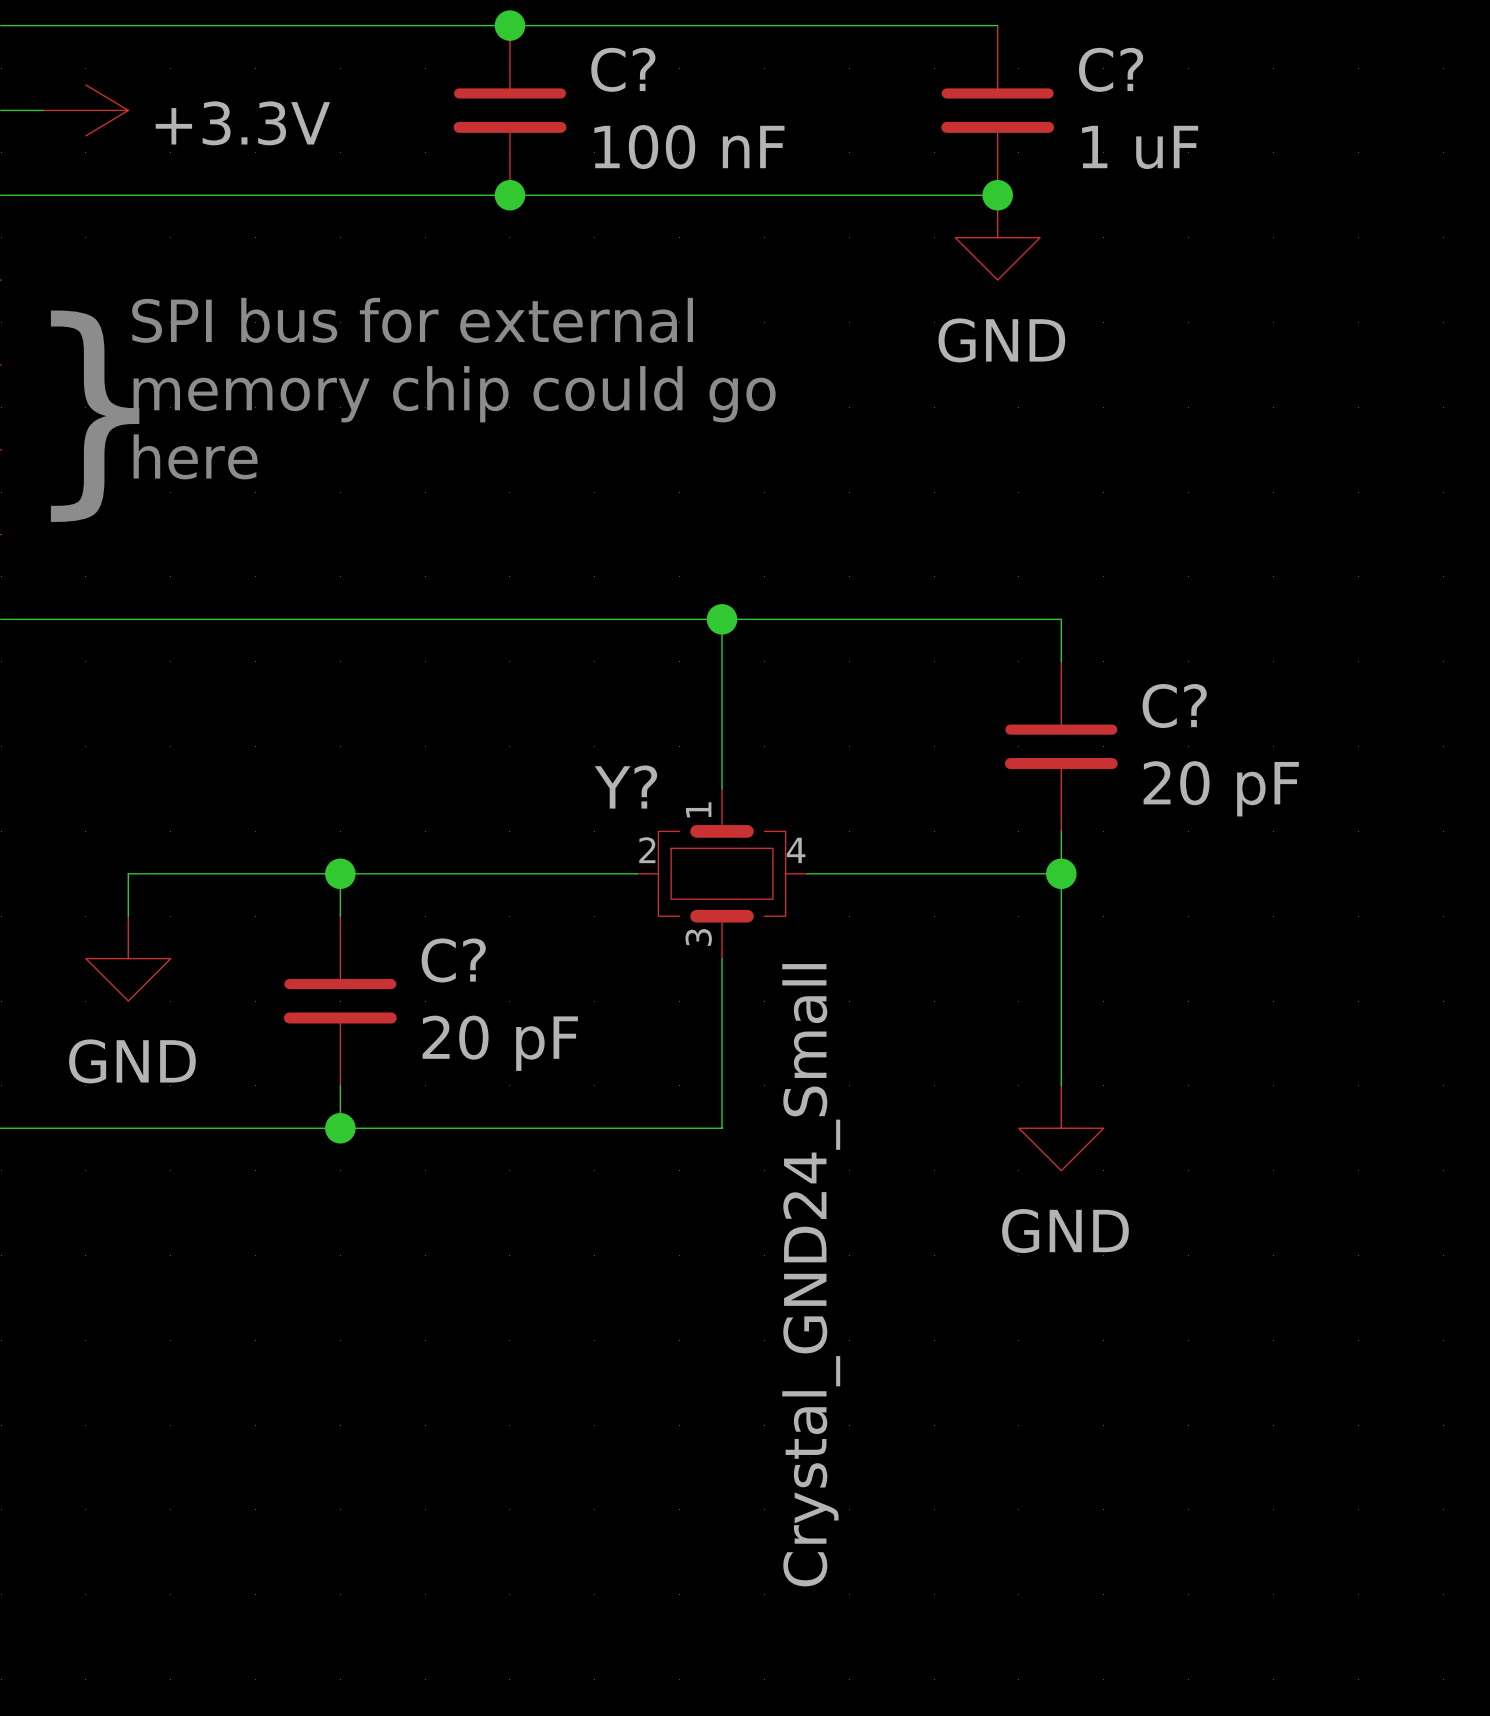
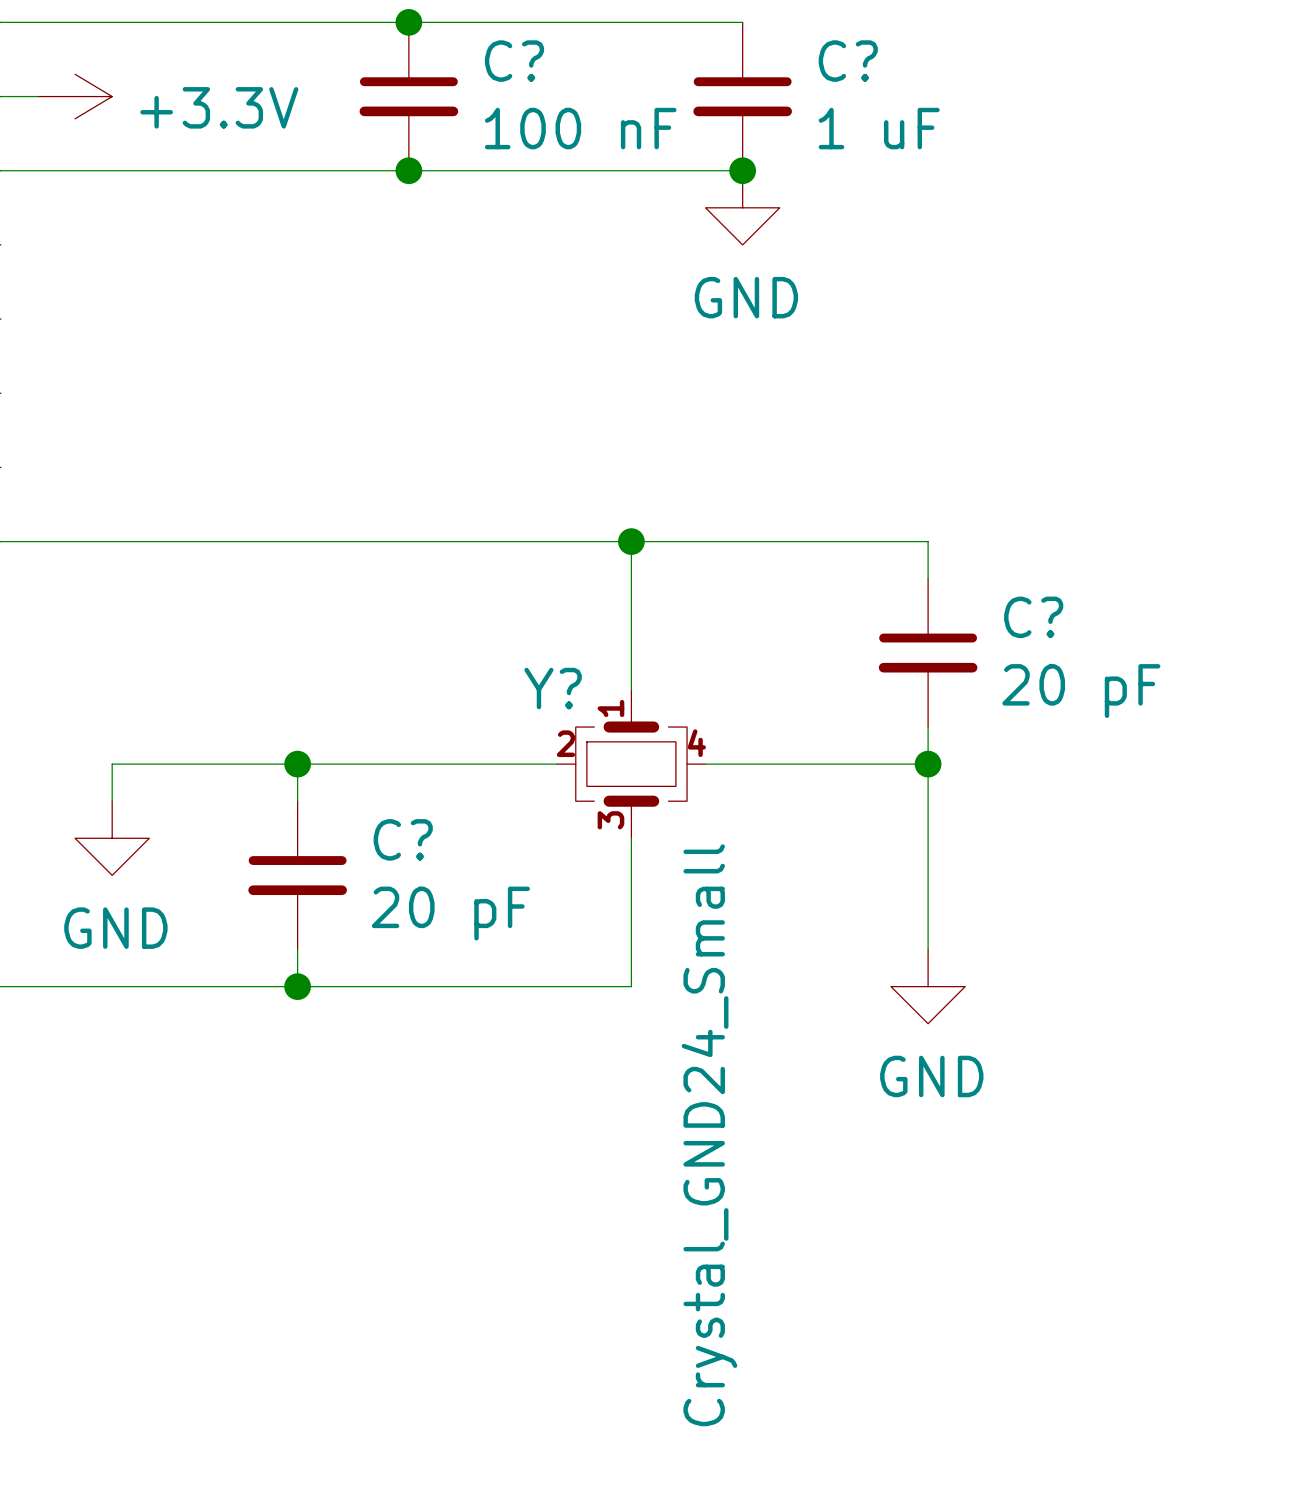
junction position: (509, 25) -> (408, 22)
wire: (849, 25) (997, 25) -> none
C? position: (509, 110) -> (408, 96)
C? position: (997, 110) -> (742, 96)
junction position: (509, 195) -> (408, 170)
wire: (849, 195) (997, 195) -> none
junction position: (997, 195) -> (742, 170)
power symbol position: GND (997, 237) -> GND (742, 207)
text: SPI bus for external (412, 320) -> none
text: memory chip could go (454, 394) -> none
text: } (95, 416) -> none
text: here (195, 456) -> none

